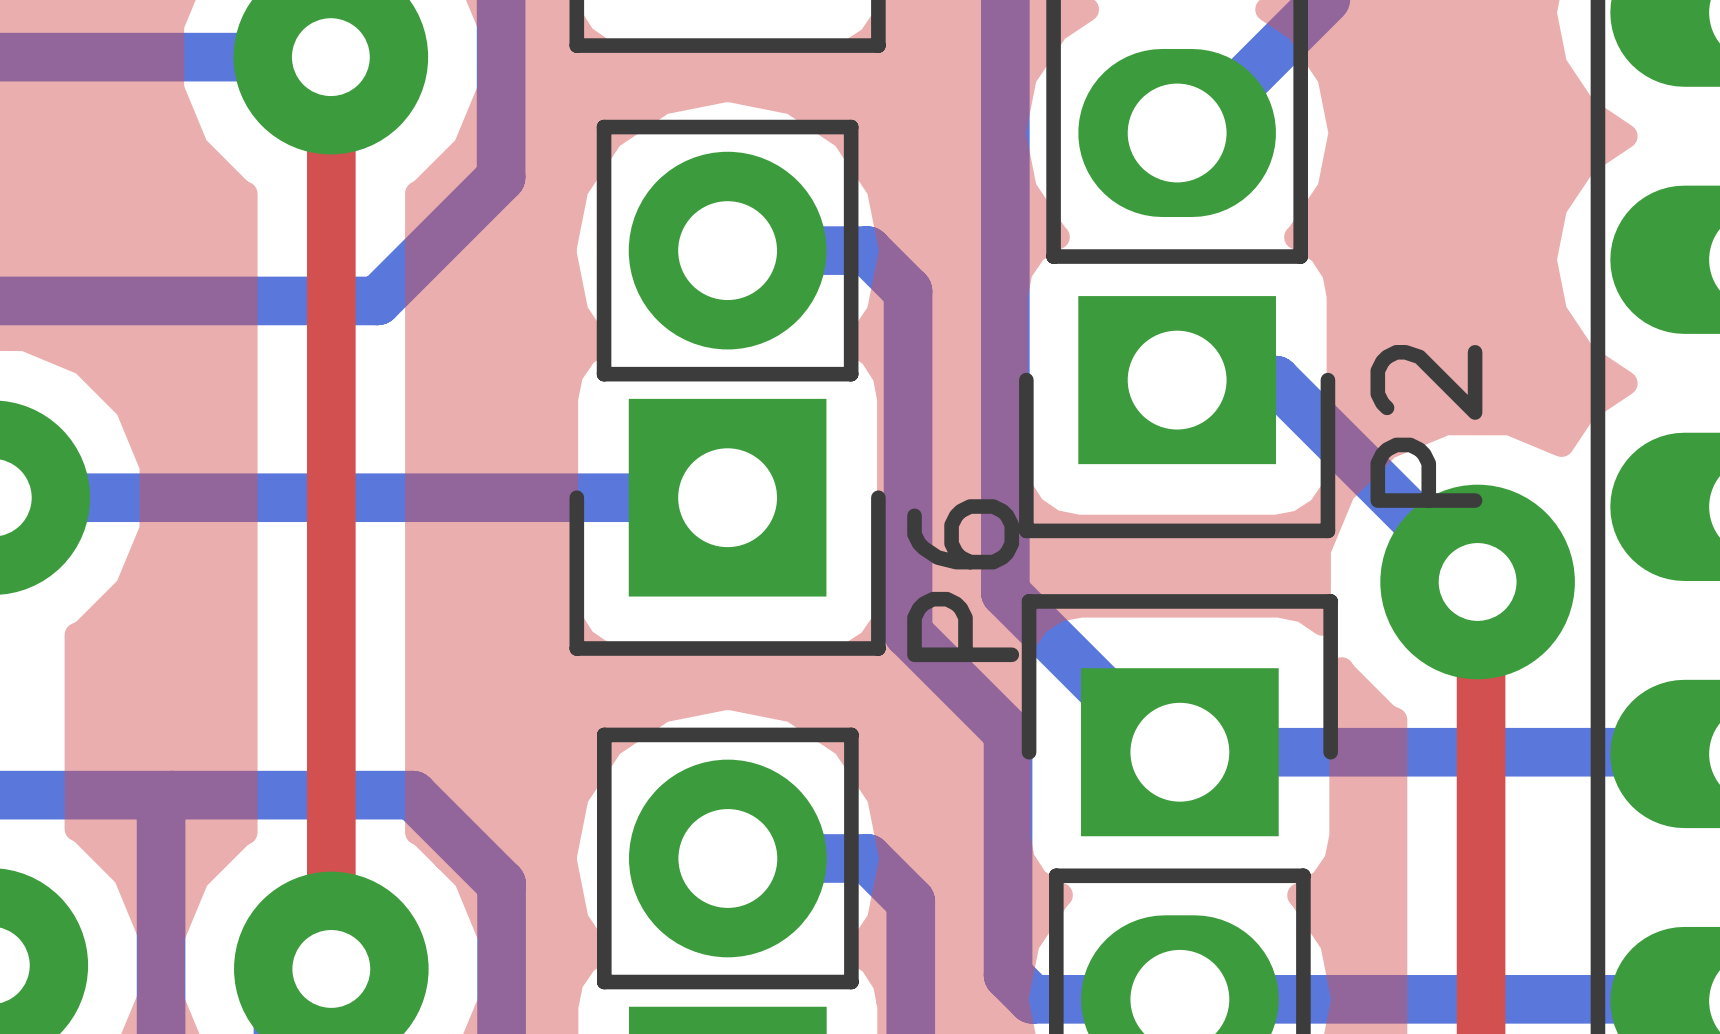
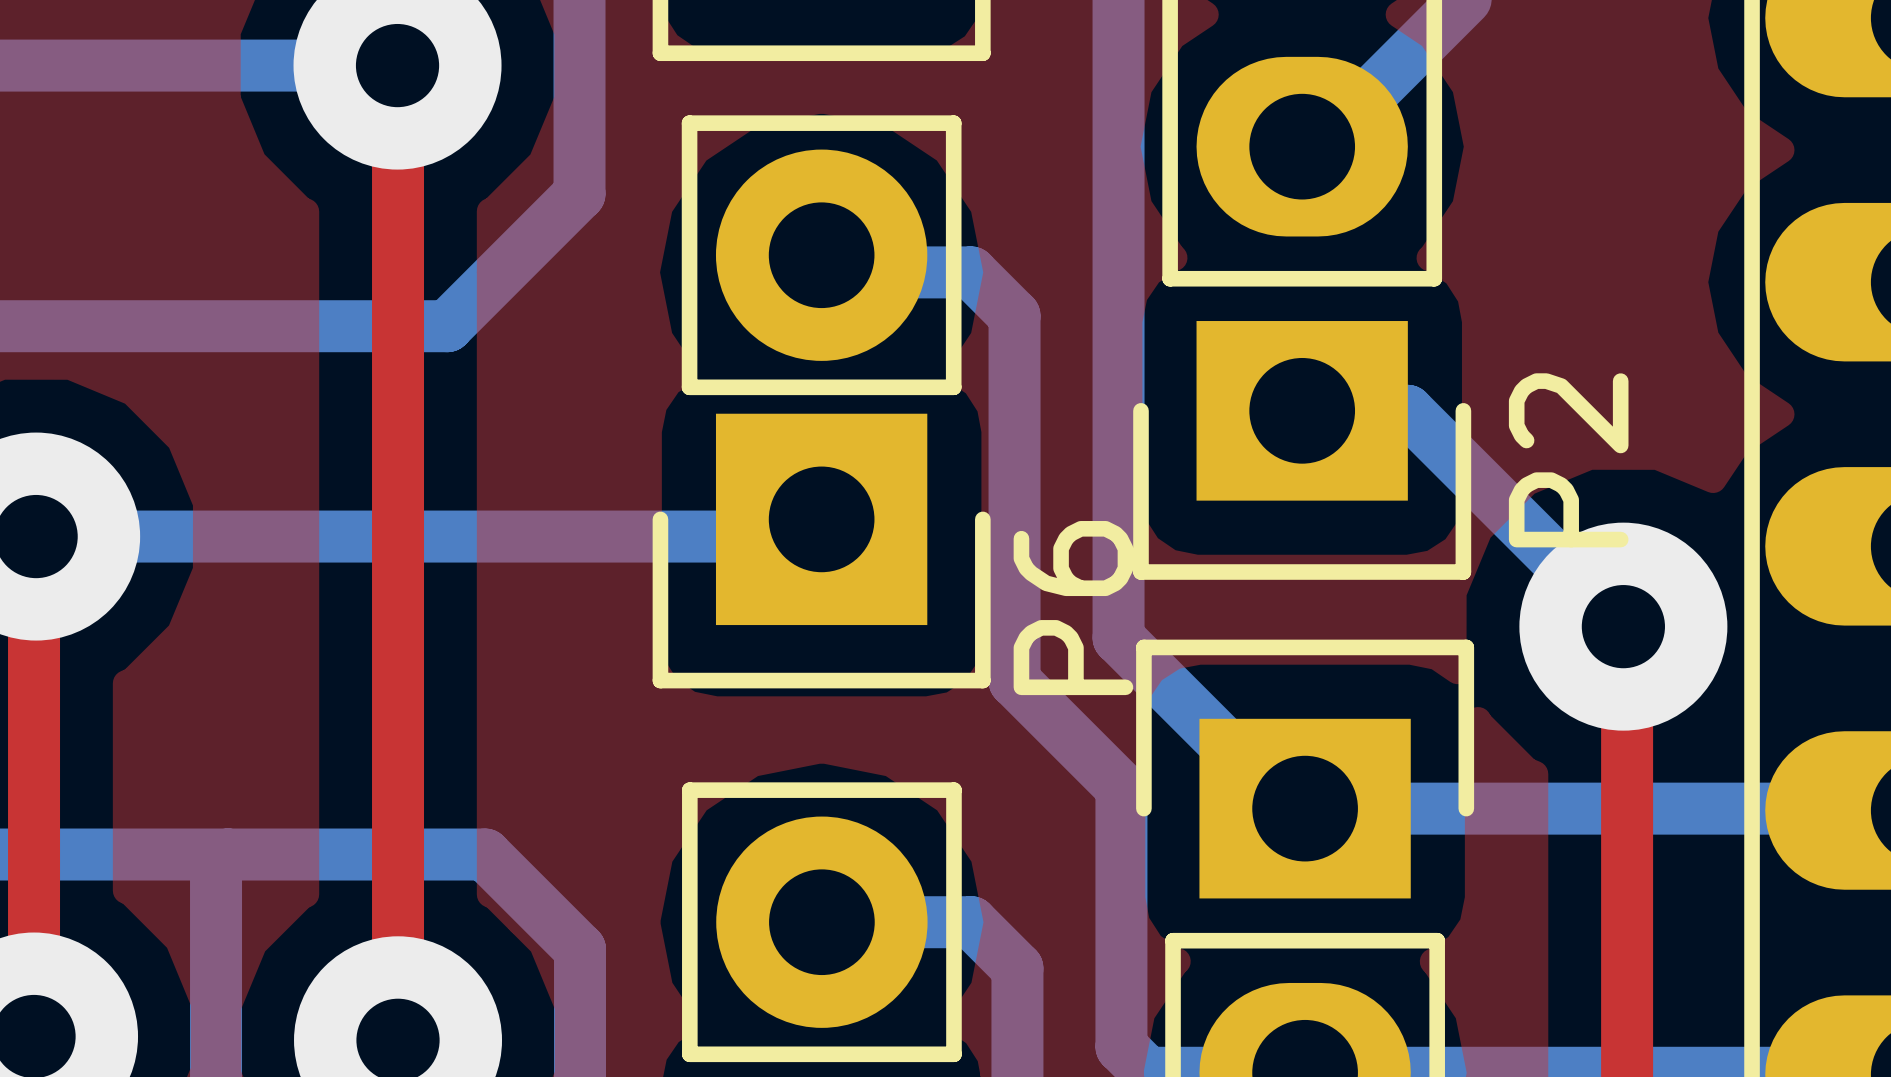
P6 position: (727, 387) -> (821, 401)

